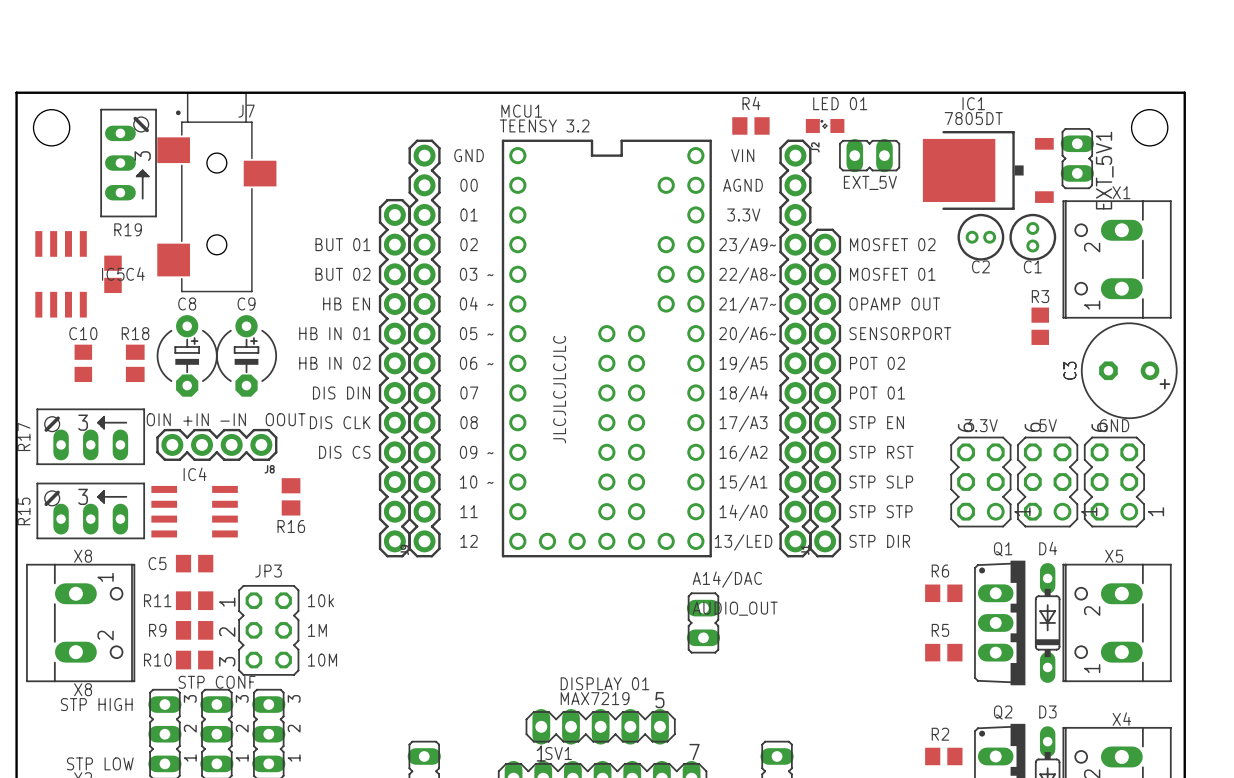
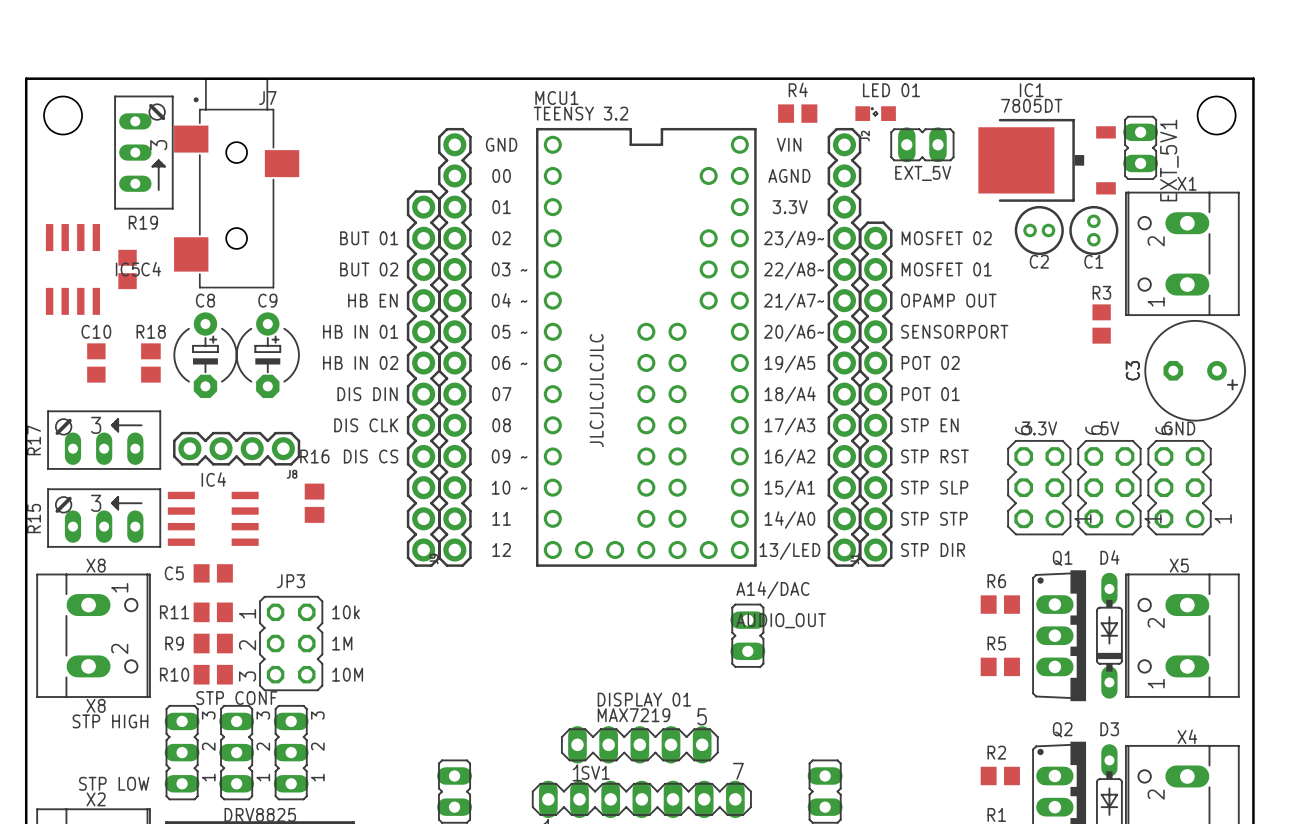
text: OIN (158, 419) -> none
text: +IN (196, 419) -> none
text: -IN (233, 419) -> none
text: OOUT (285, 419) -> none
text position: R16 (291, 526) -> R16 (314, 456)

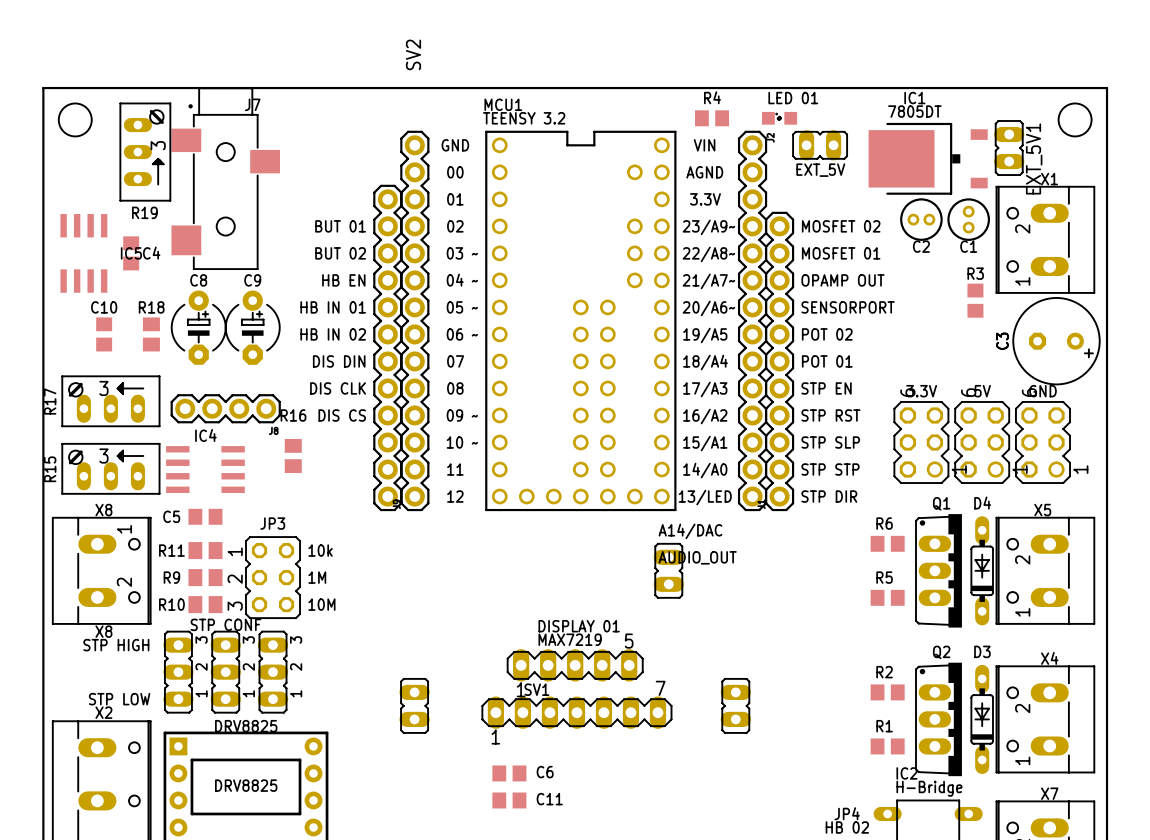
SV2 name: none -> SV2 (413, 54)
text: JLCJLCJLCJLC (596, 390) -> none

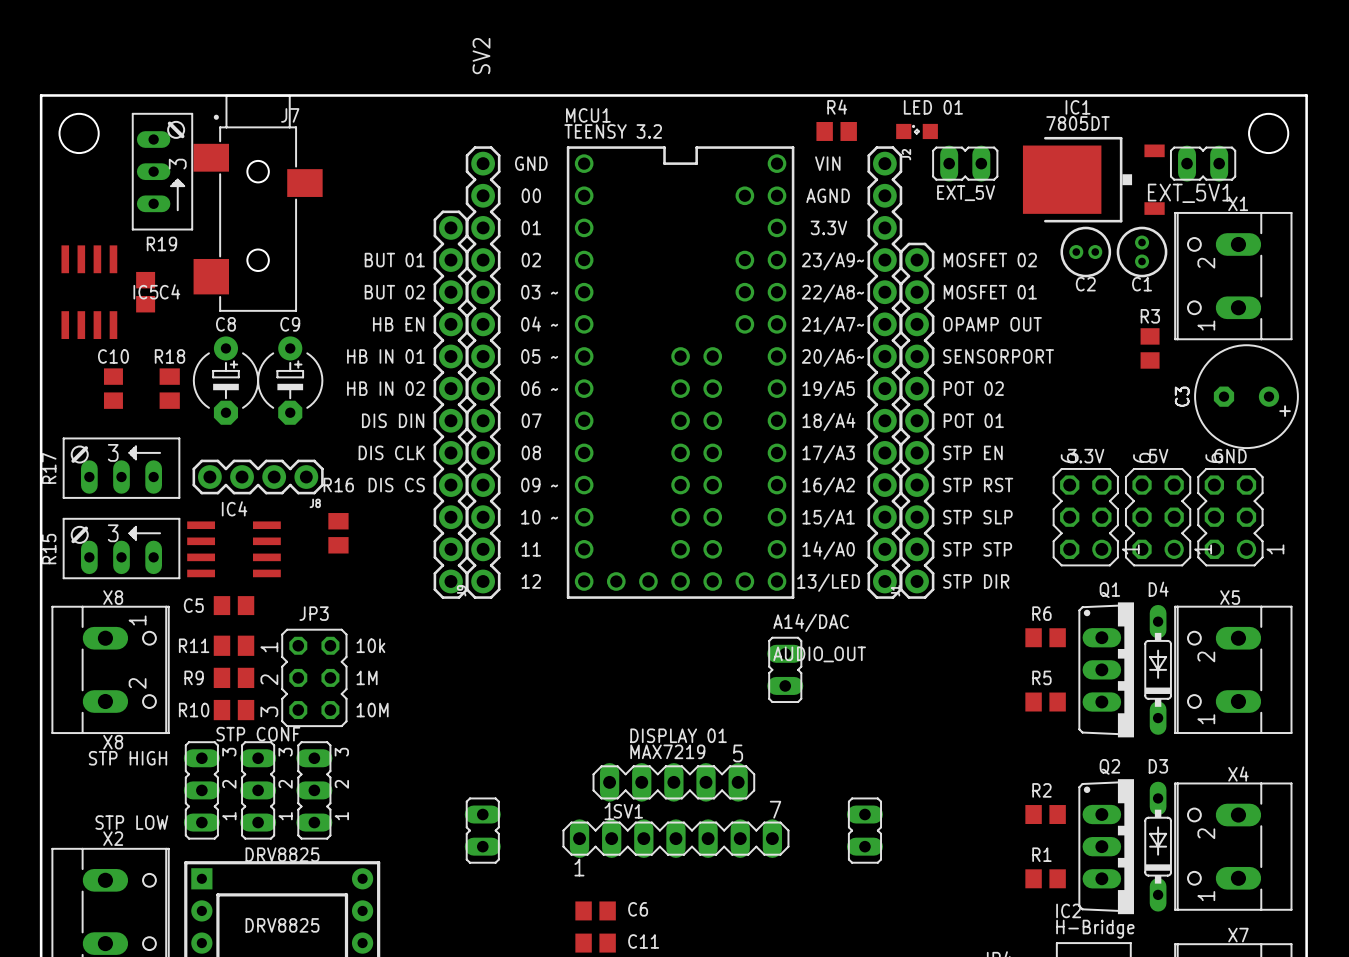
EXT_5V1 rotation: 0° (1009, 148) -> 90° clockwise (1203, 163)

